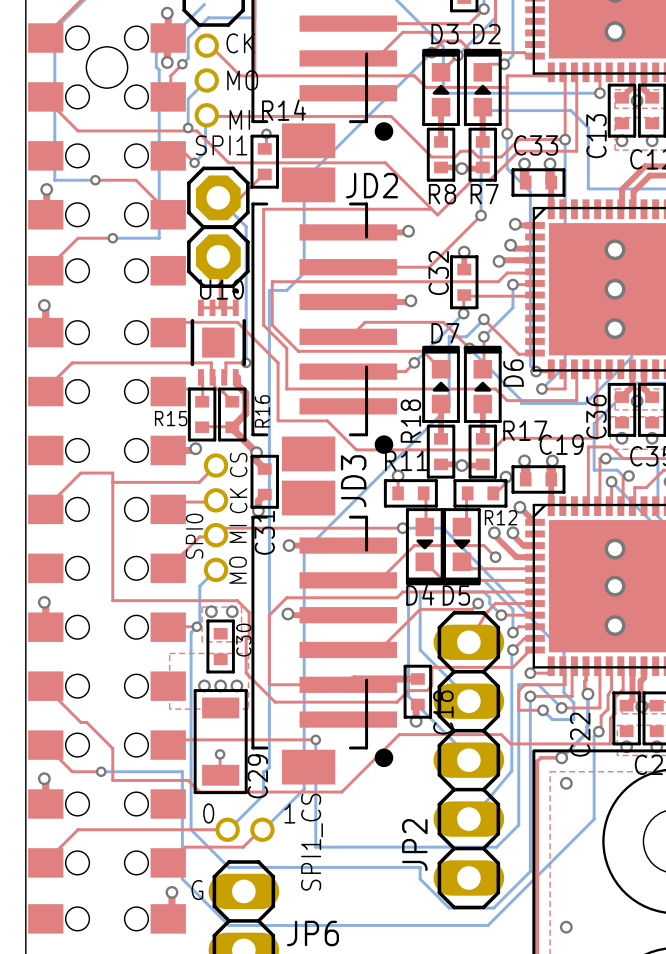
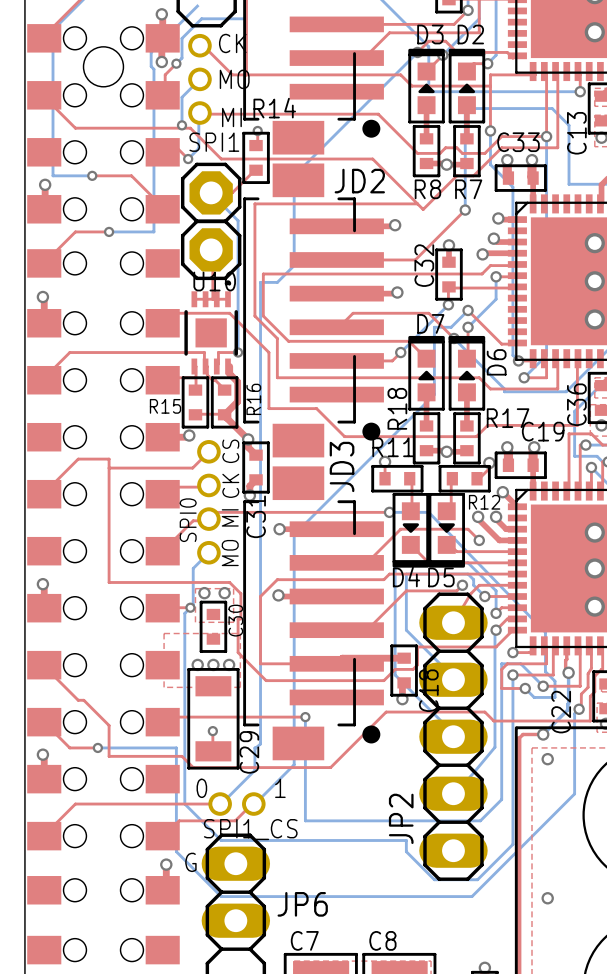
text rotation: 0° (312, 842) -> 90° clockwise (250, 829)

